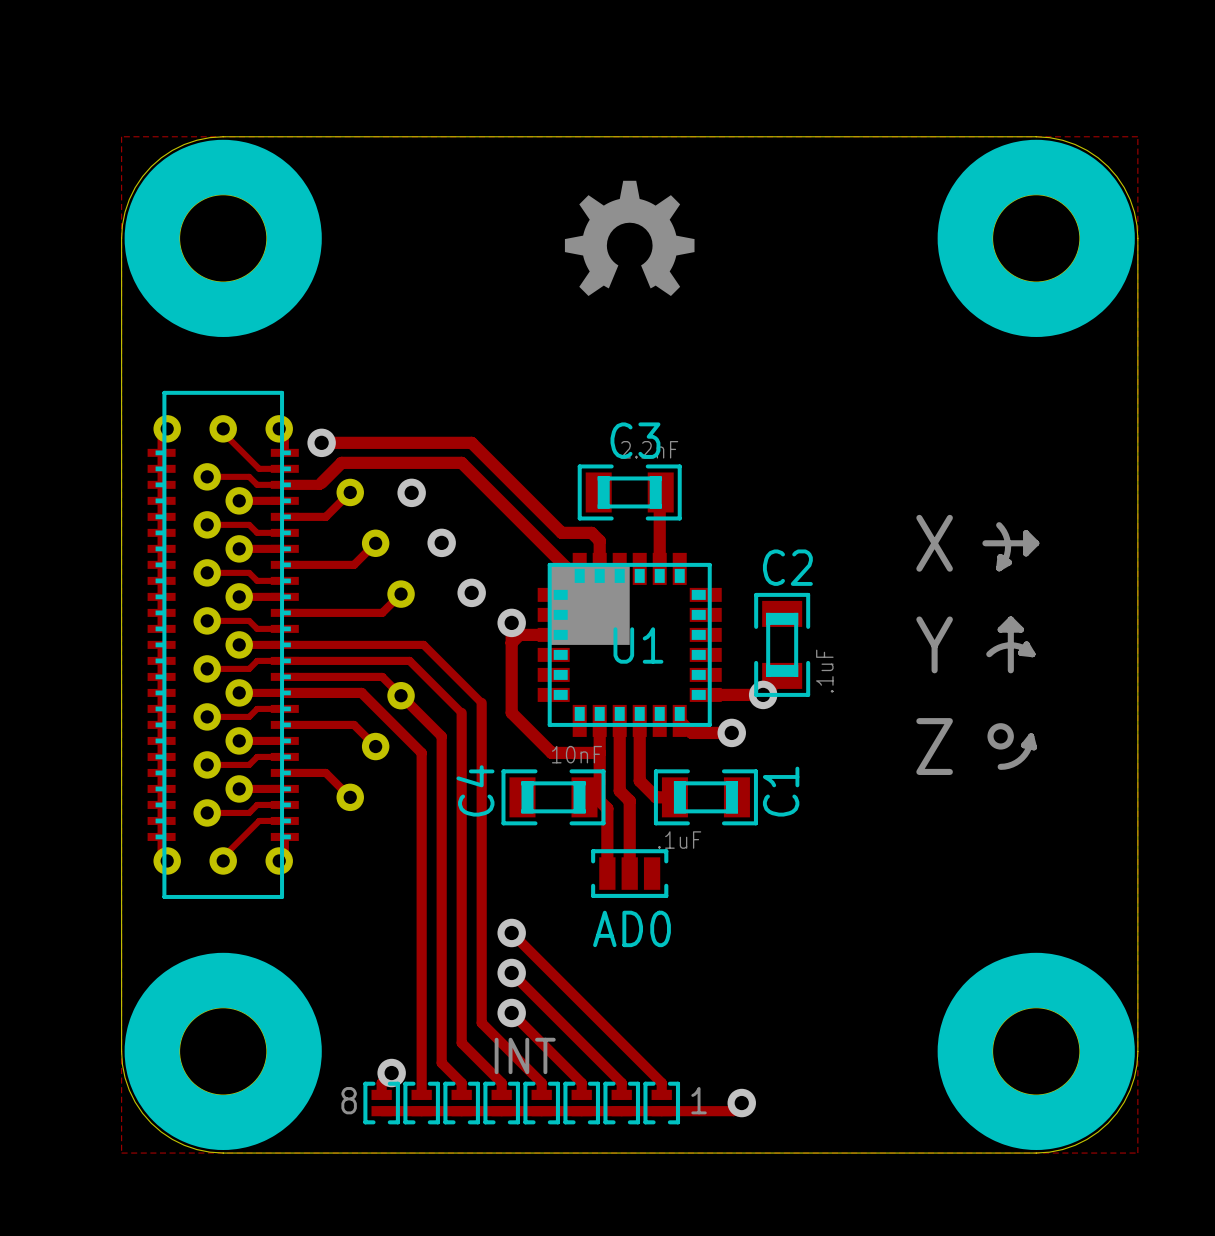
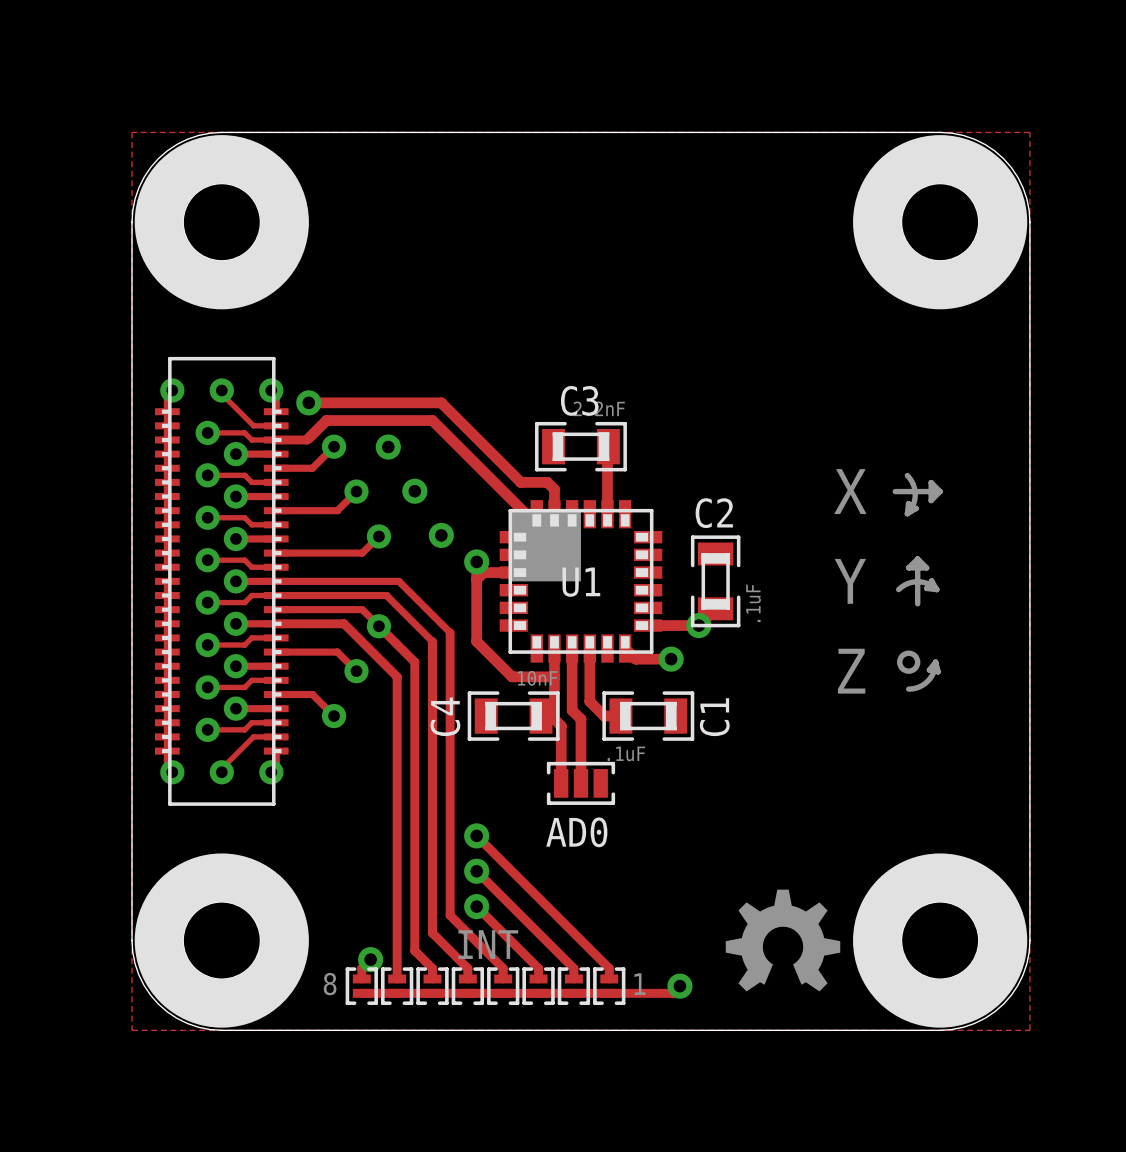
drawing position: (629, 238) -> (783, 940)

